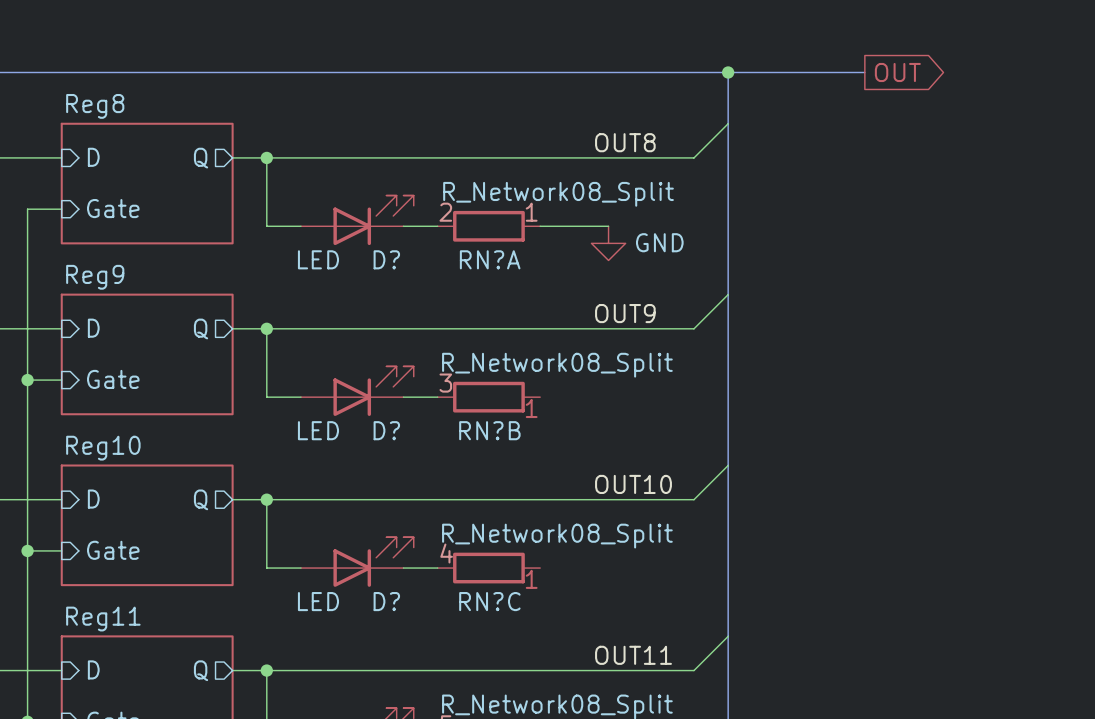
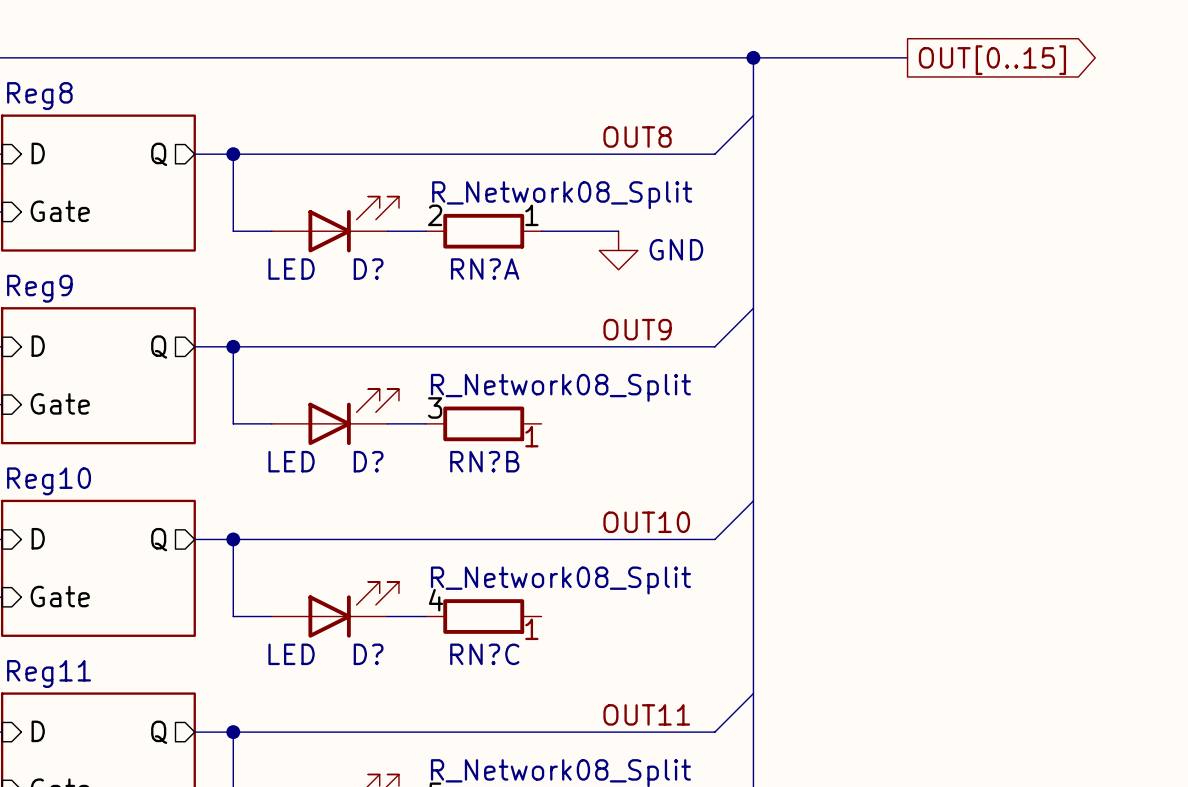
global label: OUT (897, 72) -> OUT[0..15] (992, 60)

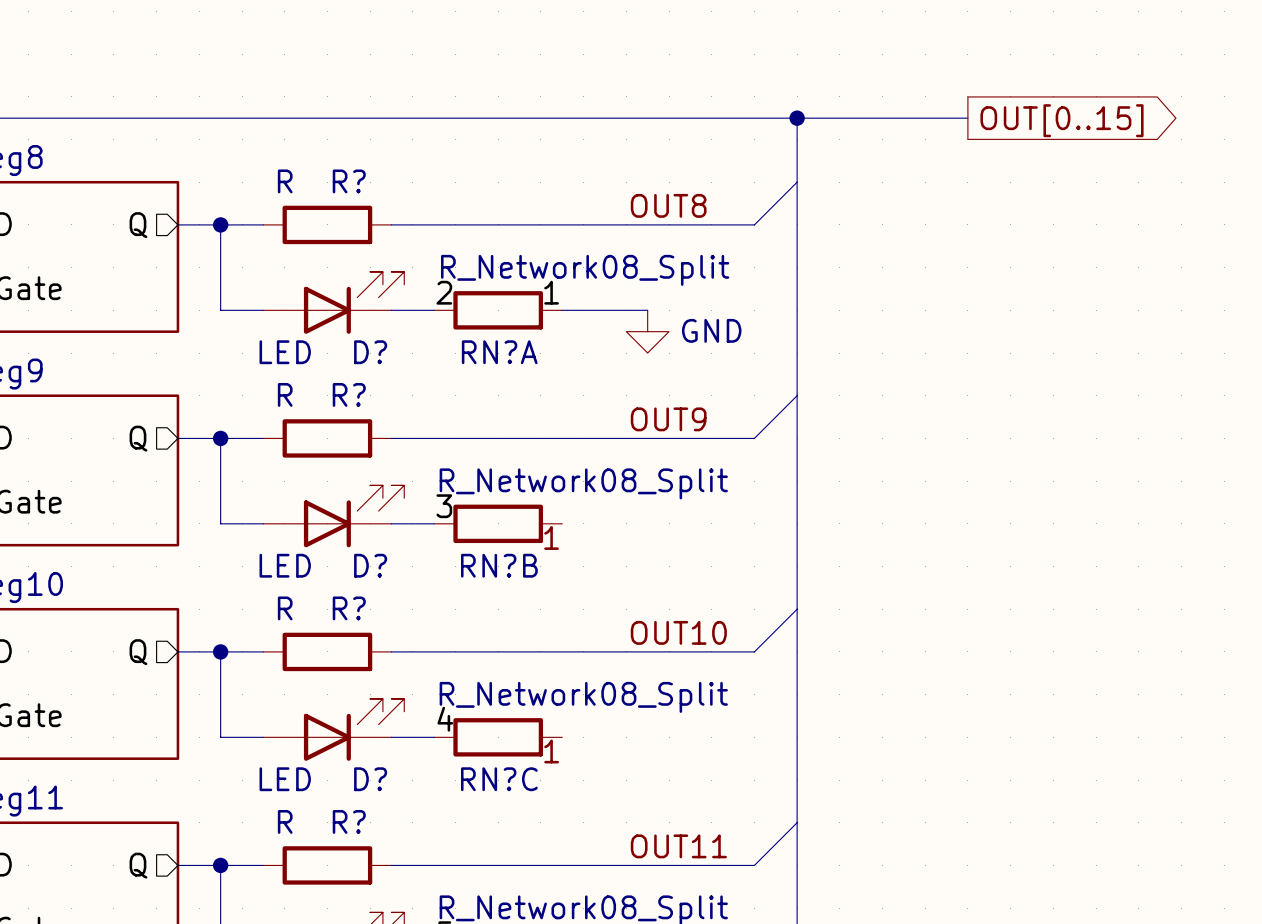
wire: (271, 154) (387, 154) -> none
R?: none -> R (327, 224)
wire: (271, 346) (387, 346) -> none
R?: none -> R (327, 438)
wire: (271, 539) (387, 539) -> none
R?: none -> R (327, 651)
wire: (271, 732) (387, 732) -> none
R?: none -> R (327, 865)

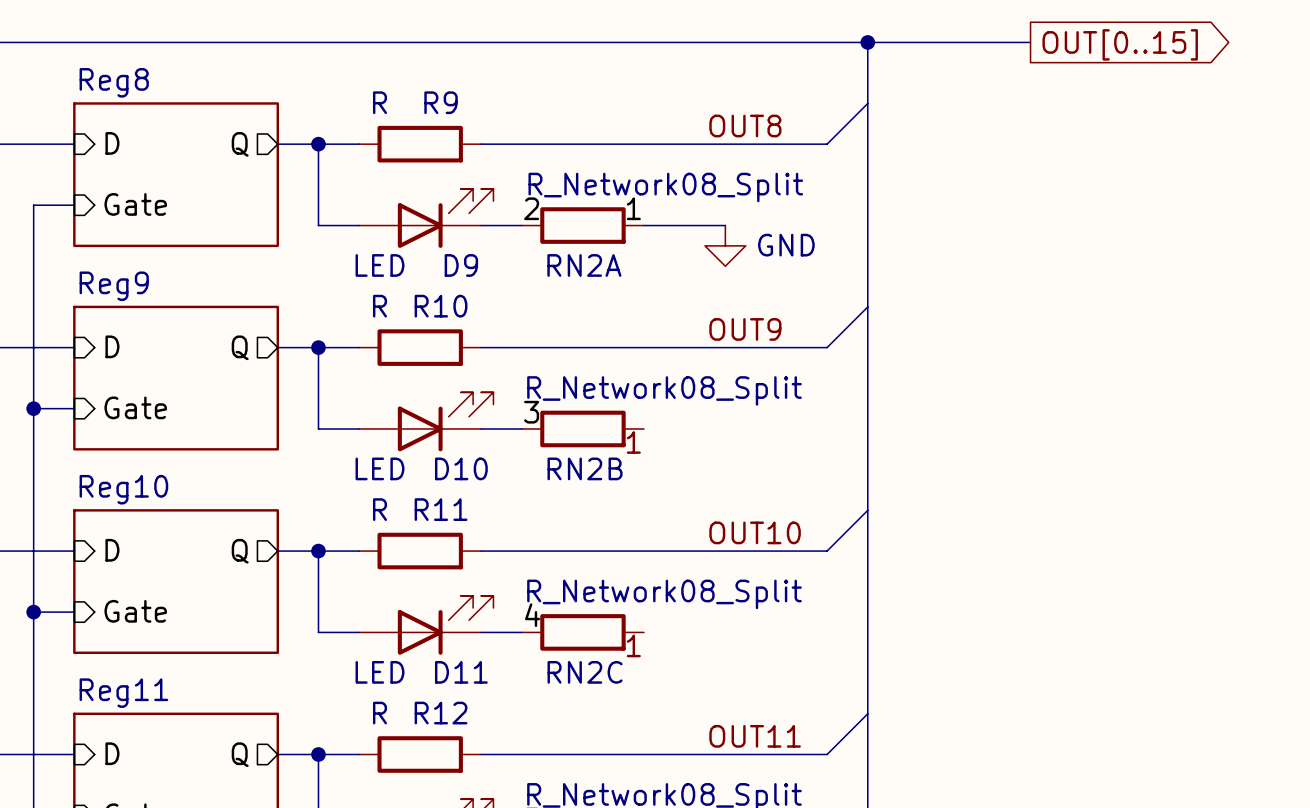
R? name: R? (349, 181) -> R9 (441, 102)
D? name: D? (370, 352) -> D9 (461, 265)
RN?A name: RN?A (499, 352) -> RN2A (584, 265)
R? name: R? (349, 394) -> R10 (441, 306)
D? name: D? (370, 565) -> D10 (461, 468)
RN?B name: RN?B (499, 565) -> RN2B (585, 468)
R? name: R? (349, 608) -> R11 (441, 509)
D? name: D? (370, 779) -> D11 (461, 672)
RN?C name: RN?C (499, 779) -> RN2C (585, 672)
R? name: R? (349, 821) -> R12 (441, 713)

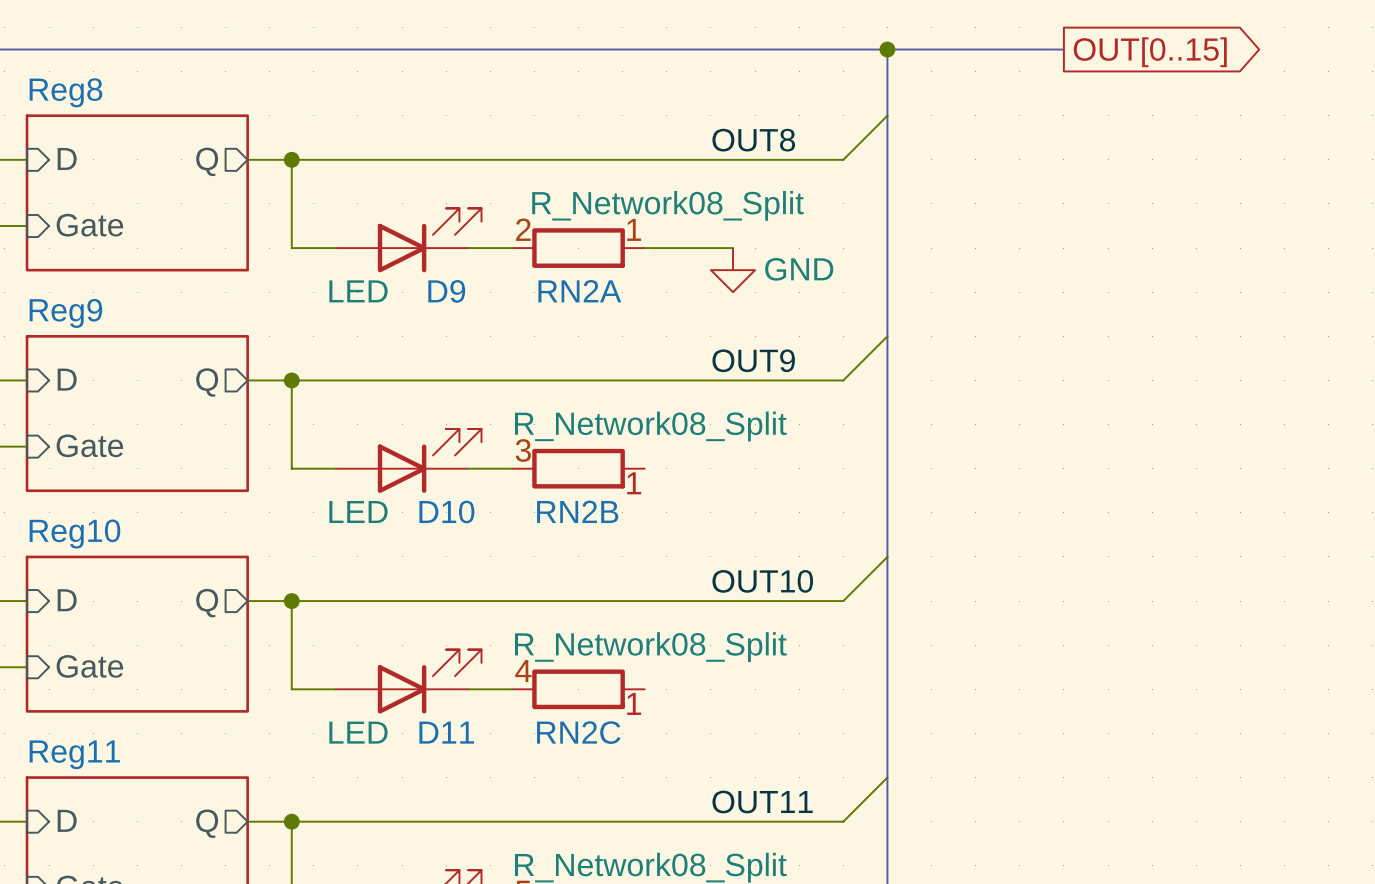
wire: none -> (335, 159) (468, 159)
R9: R (420, 144) -> none
wire: none -> (335, 380) (468, 380)
R10: R (420, 347) -> none
wire: none -> (335, 601) (468, 601)
R11: R (420, 551) -> none
wire: none -> (335, 821) (468, 821)
R12: R (420, 754) -> none

